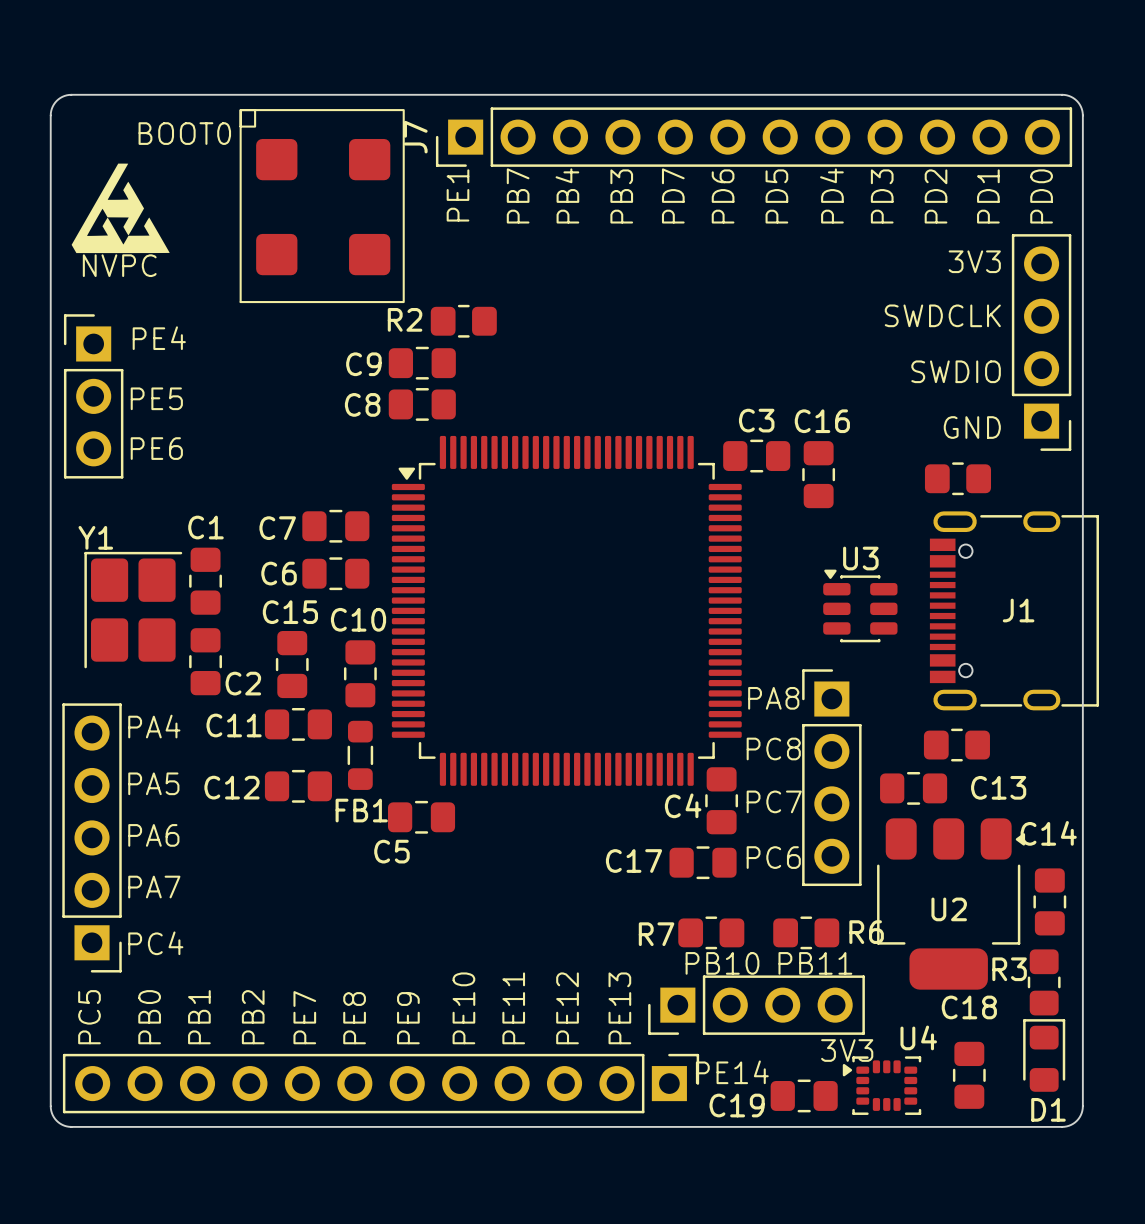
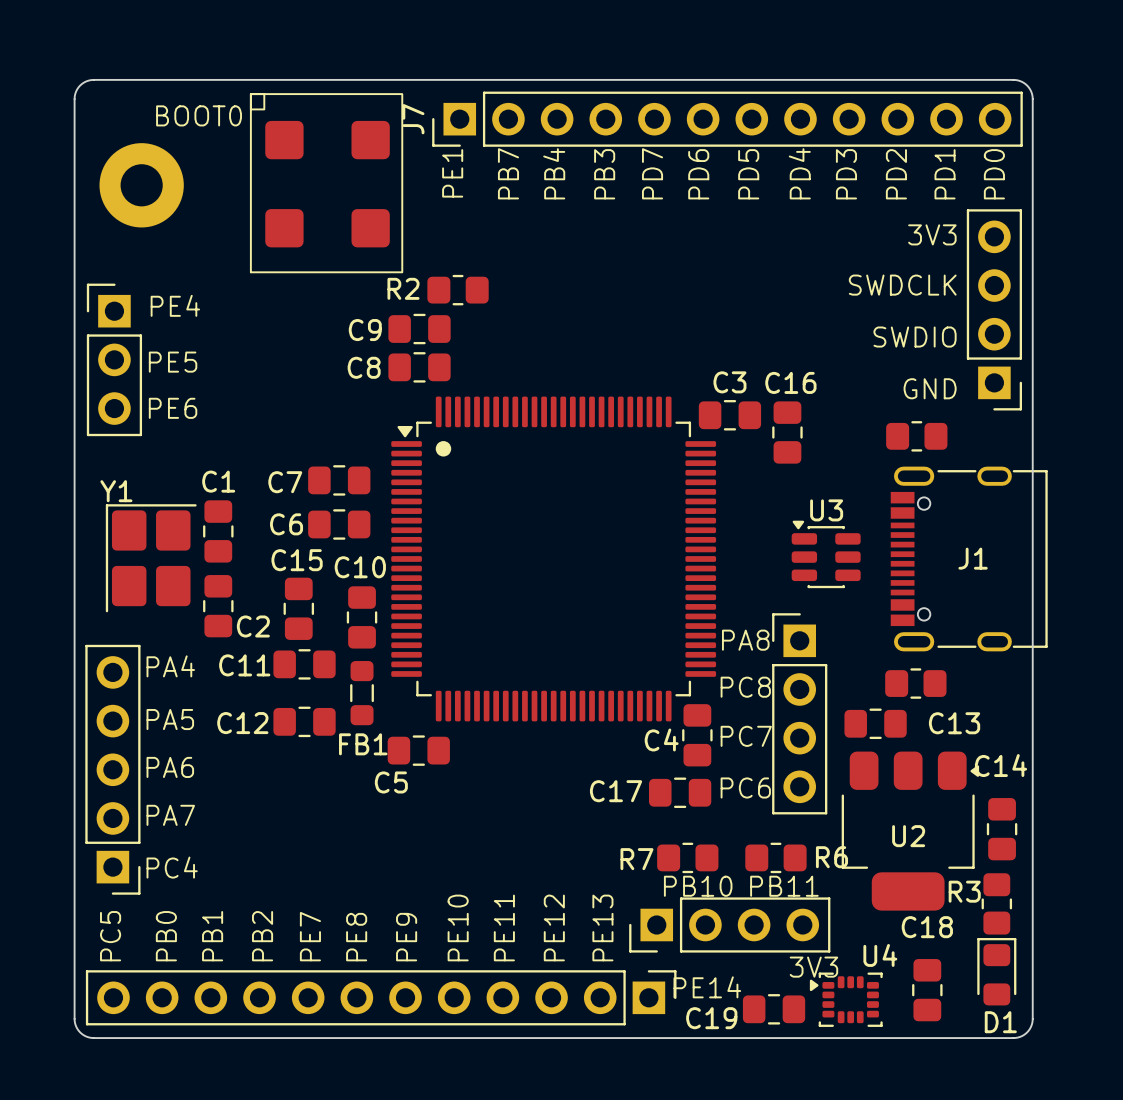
drawing: [71, 163, 170, 254] -> none
part: none -> (141, 185)
drawing: none -> [435, 441, 452, 457]

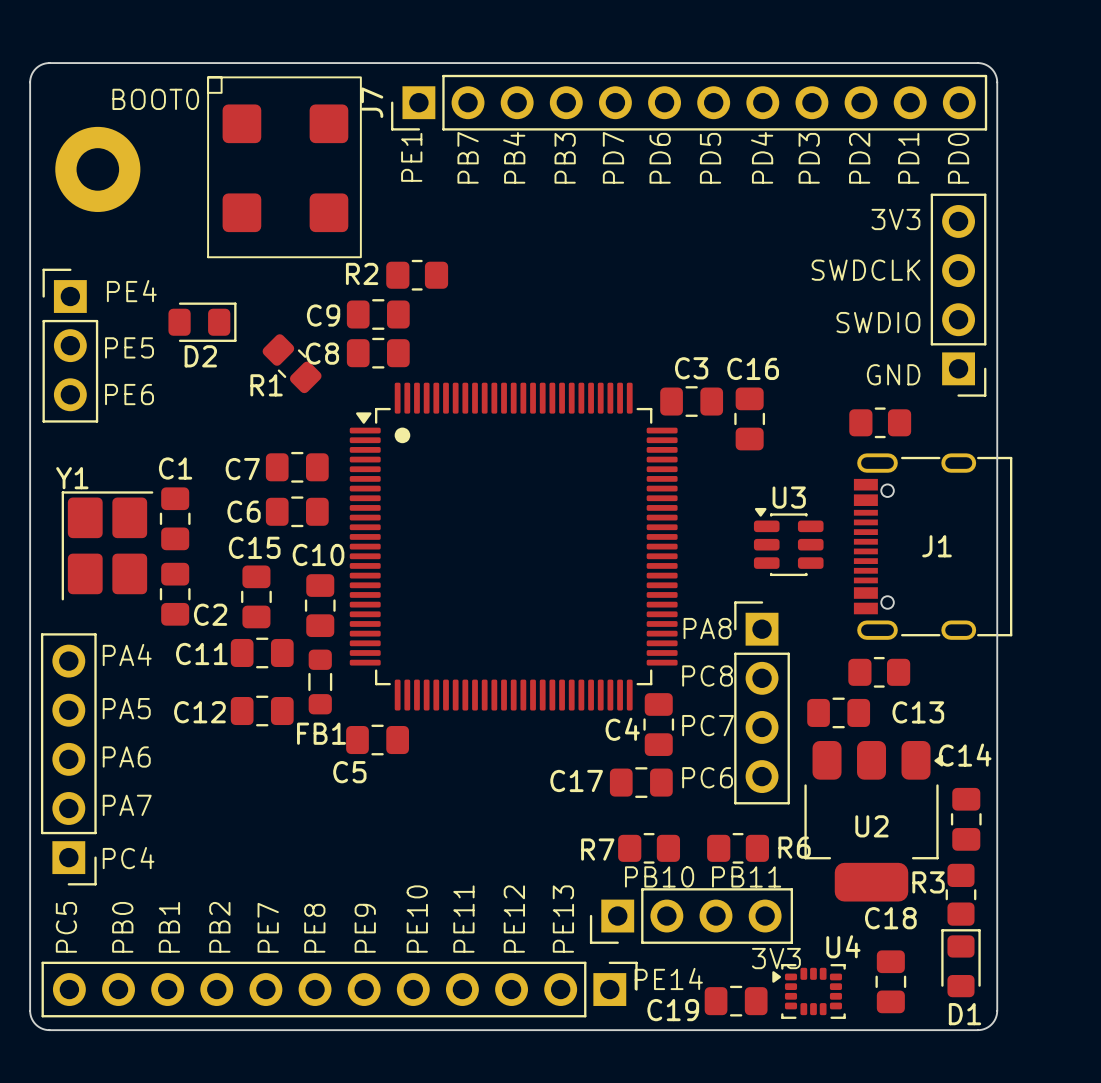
D2: none -> (202, 322)
R1: none -> (292, 363)

